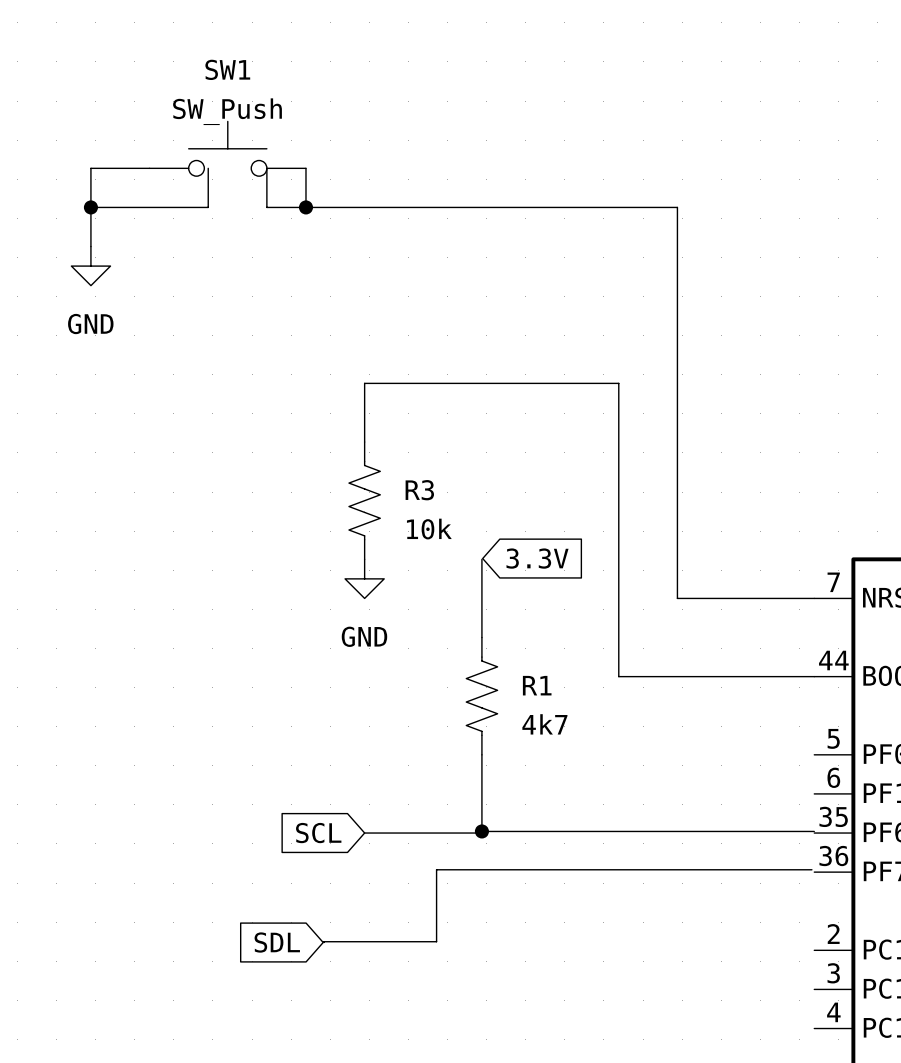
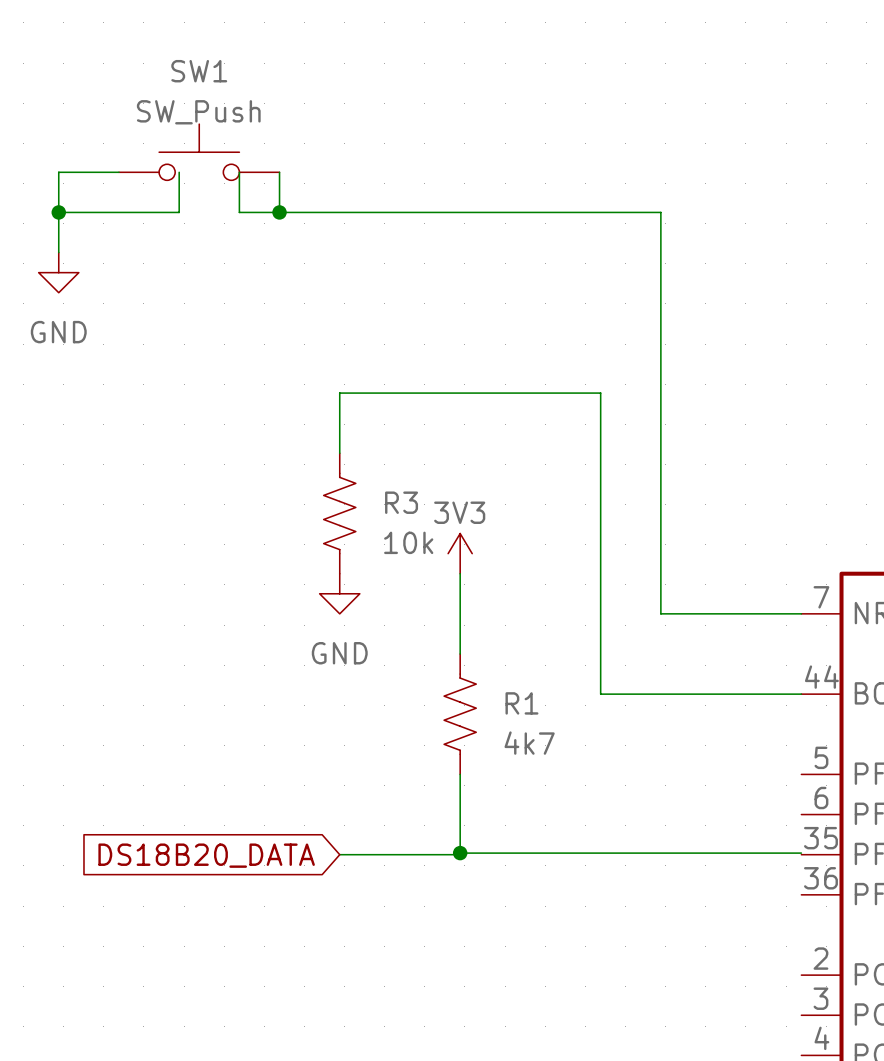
power symbol: none -> 3V3 (460, 553)
global label: 3.3V (537, 558) -> none
global label: SCL (318, 833) -> DS18B20_DATA (206, 855)
wire: (811, 869) (436, 869) (436, 941) (323, 942) -> none
global label: SDL (277, 942) -> none

